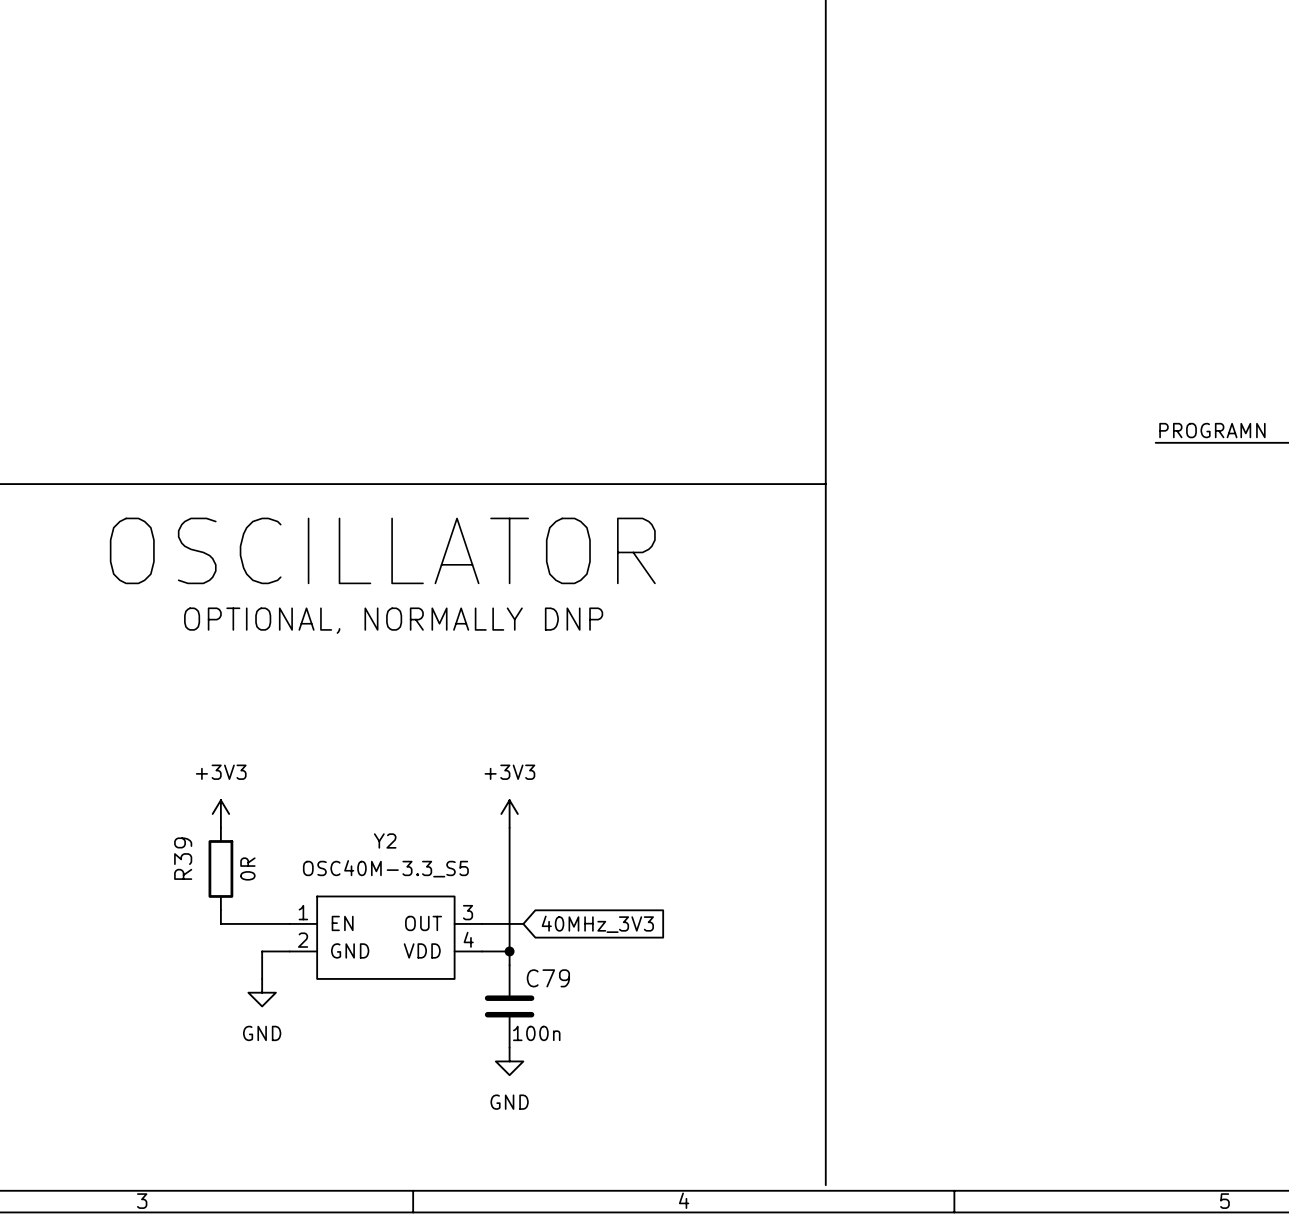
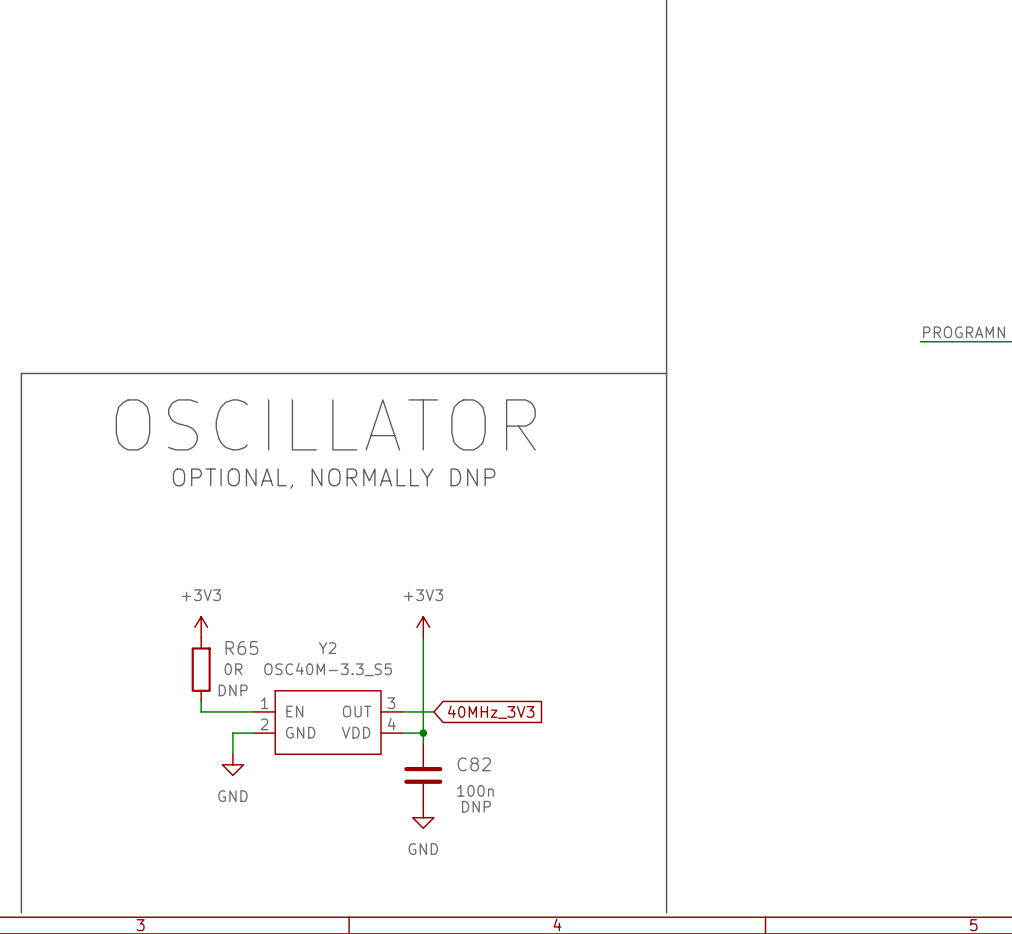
R39 name: R39 (183, 858) -> R65 (241, 648)
R39 text rotation: 0° (247, 868) -> 90° clockwise (233, 669)
R39 text: none -> DNP (233, 690)
C79 name: C79 (548, 978) -> C82 (474, 764)
C79 text position: 100n (536, 1033) -> 100n (475, 790)
C79 text: none -> DNP (476, 806)

